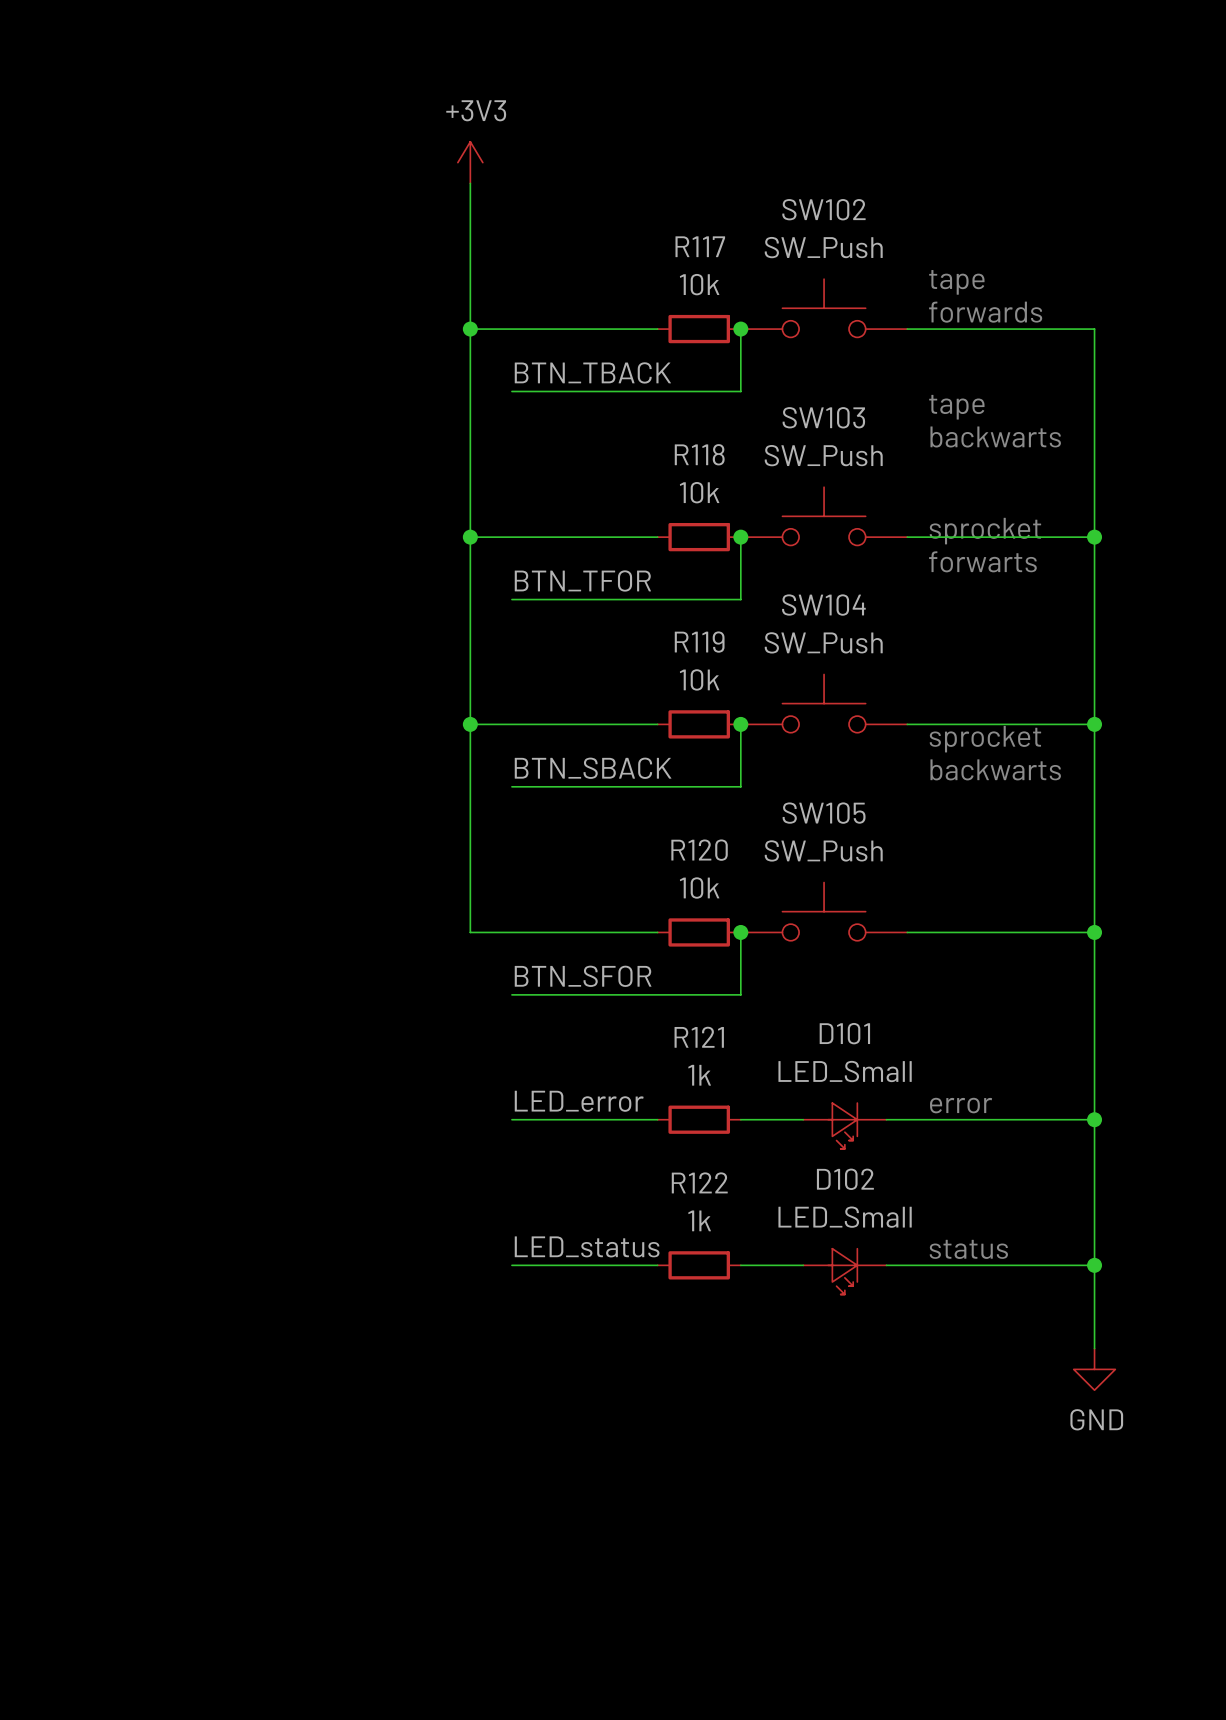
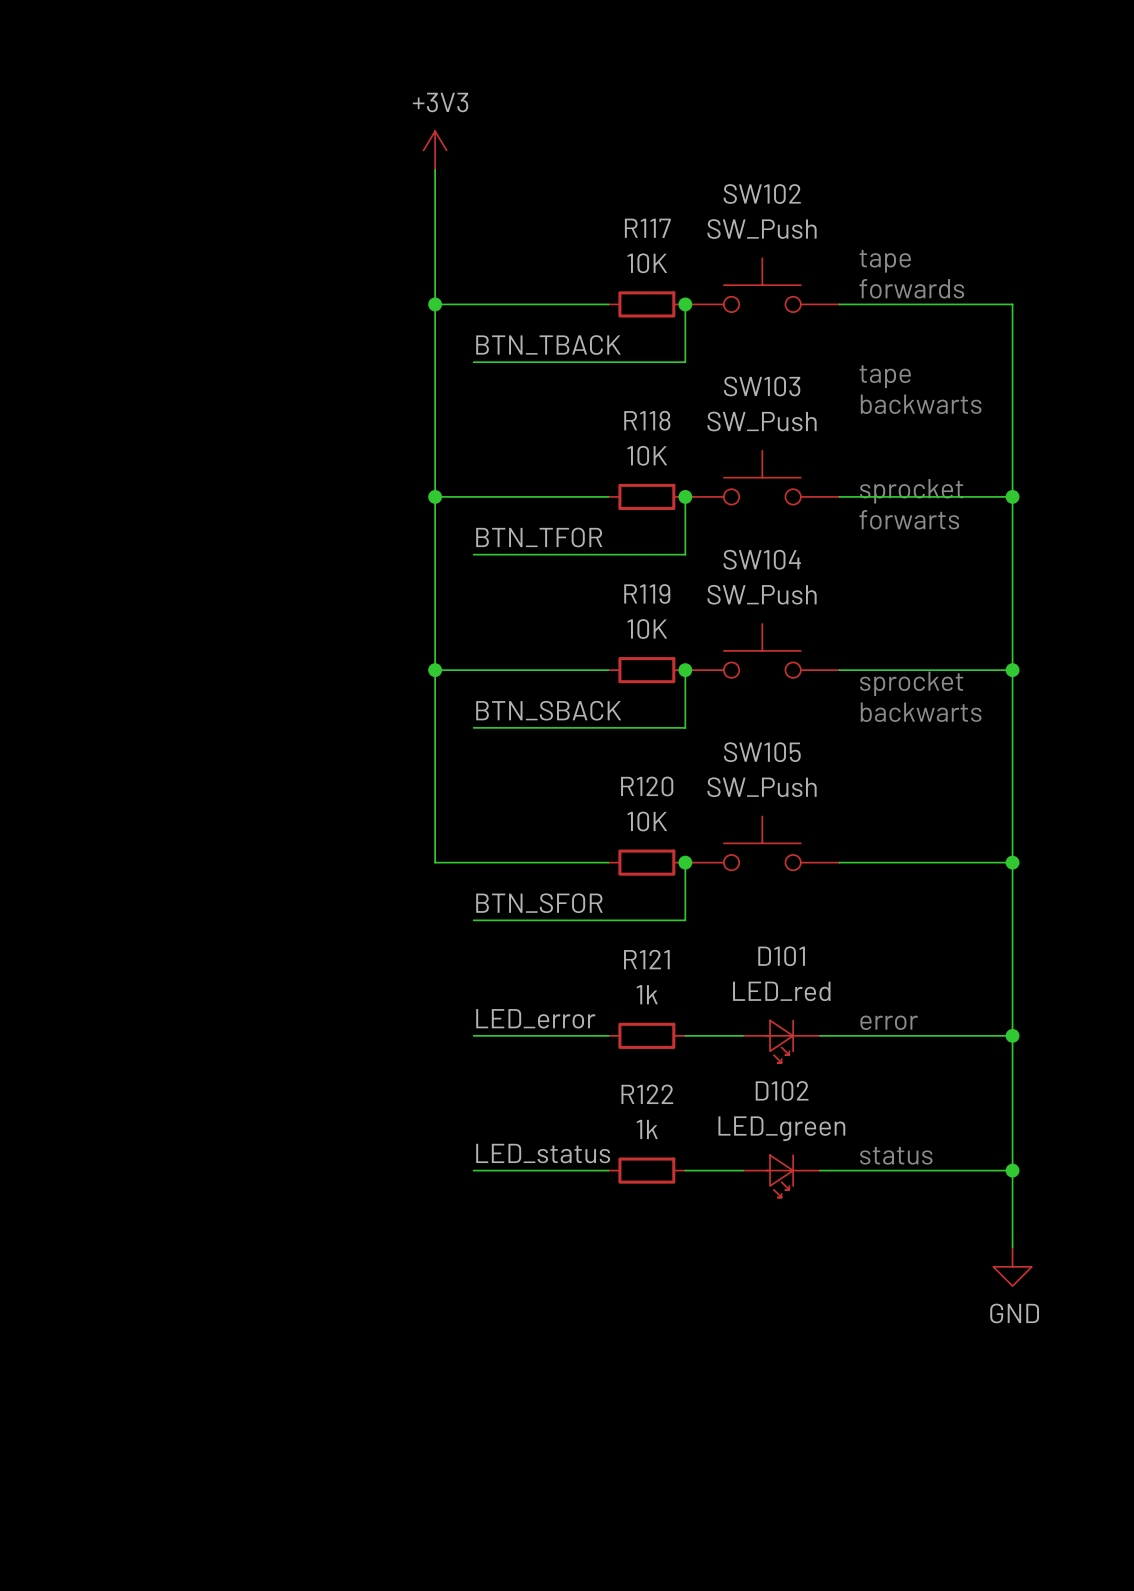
R117 value: 10k (699, 284) -> 10K (647, 263)
R118 value: 10k (699, 492) -> 10K (647, 455)
R119 value: 10k (699, 679) -> 10K (647, 629)
R120 value: 10k (699, 888) -> 10K (647, 821)
D101 value: LED_Small (845, 1071) -> LED_red (781, 991)
D102 value: LED_Small (845, 1217) -> LED_green (781, 1128)

